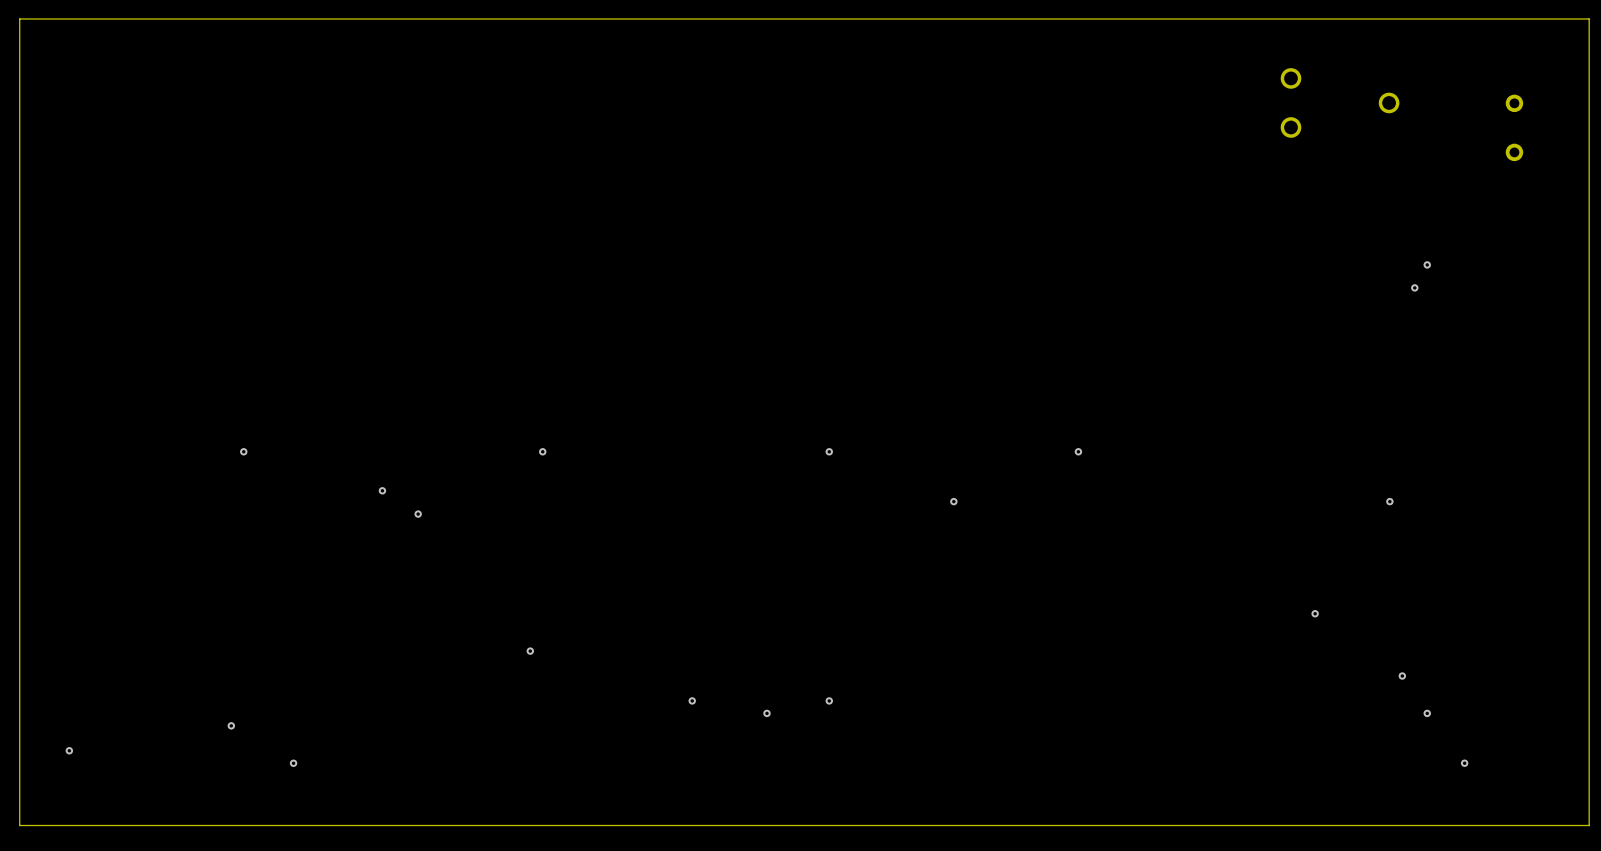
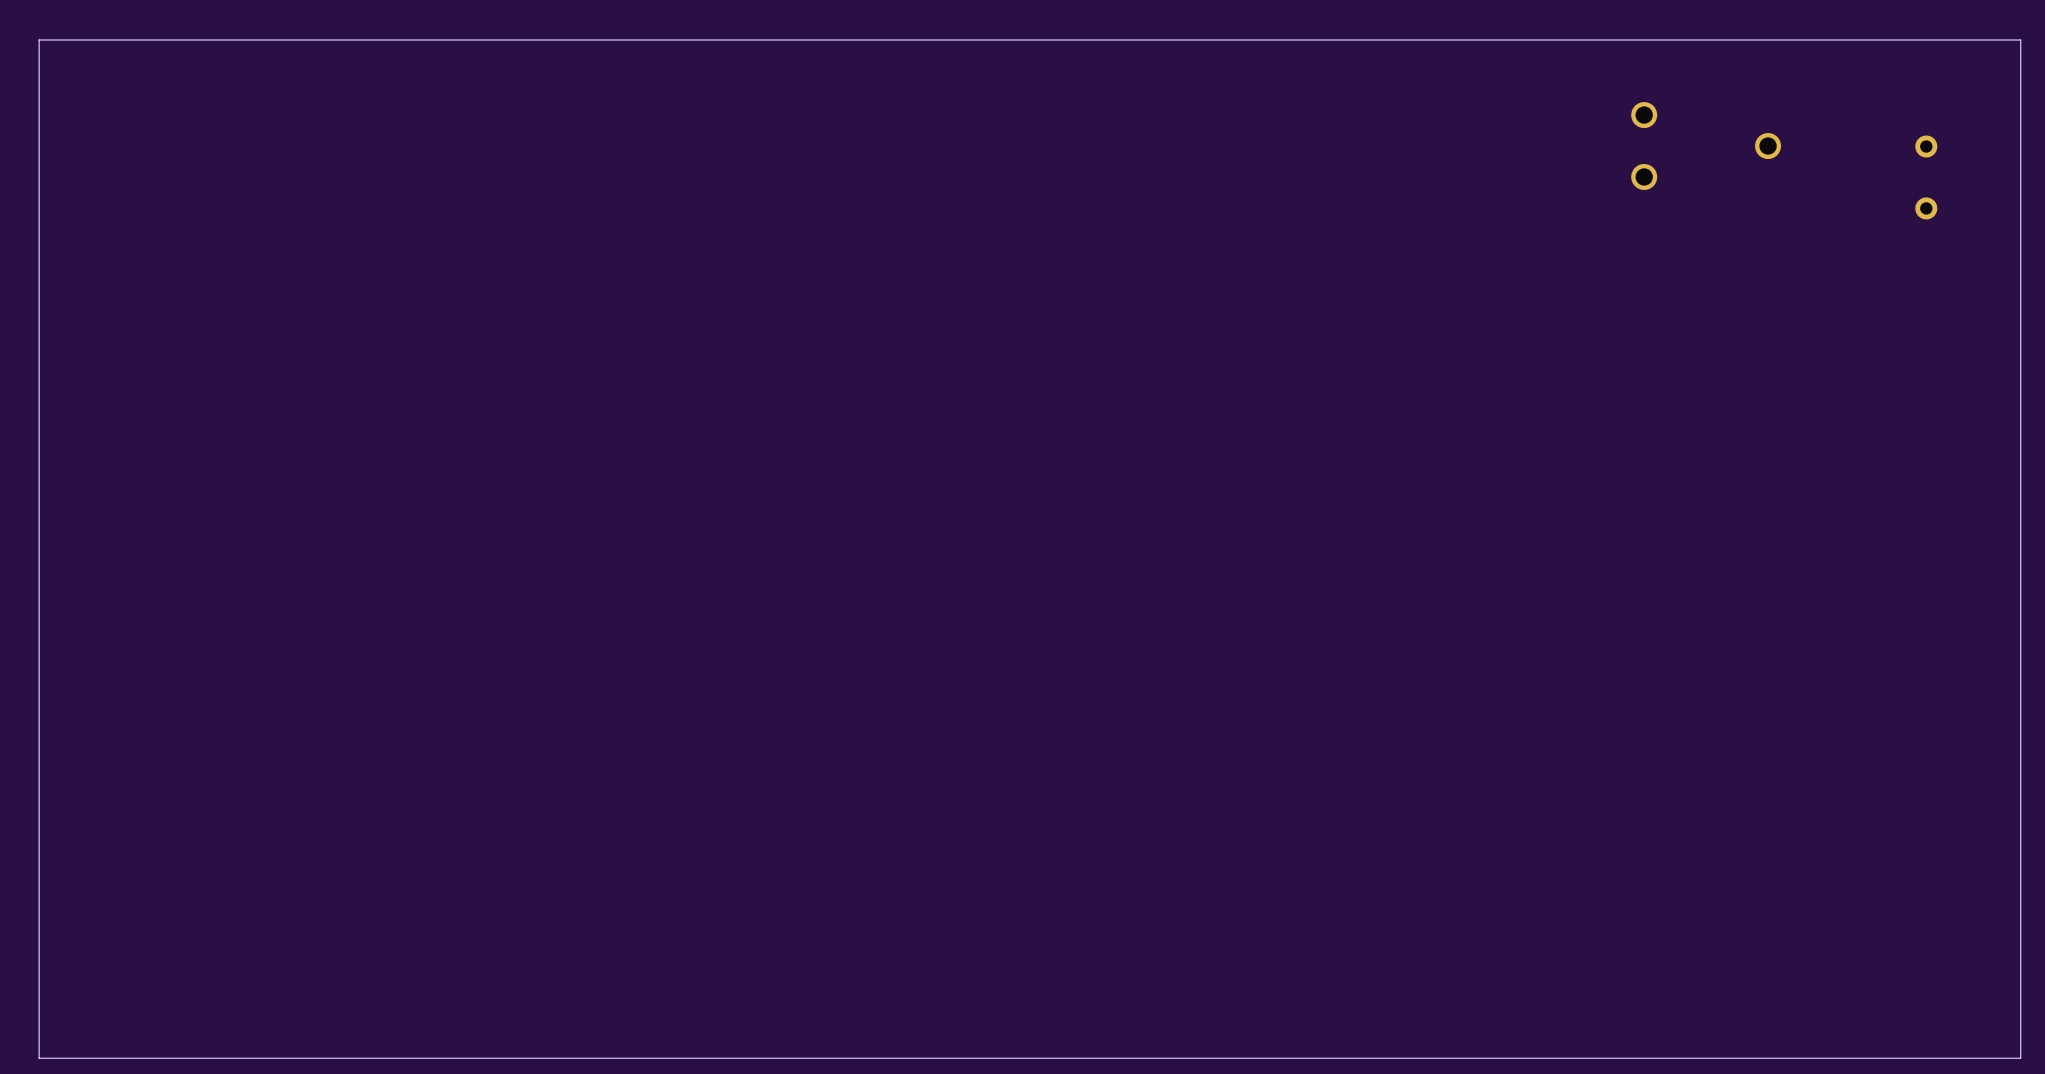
via: (1427, 264) -> none
via: (1414, 287) -> none
via: (243, 451) -> none
via: (542, 451) -> none
via: (829, 451) -> none
via: (1078, 451) -> none
via: (382, 490) -> none
via: (953, 501) -> none
via: (1389, 501) -> none
via: (418, 514) -> none
via: (1315, 613) -> none
via: (530, 651) -> none
via: (1402, 676) -> none
via: (692, 700) -> none
via: (829, 700) -> none
via: (766, 713) -> none
via: (1427, 713) -> none
via: (231, 725) -> none
via: (69, 750) -> none
via: (293, 763) -> none
via: (1464, 763) -> none

